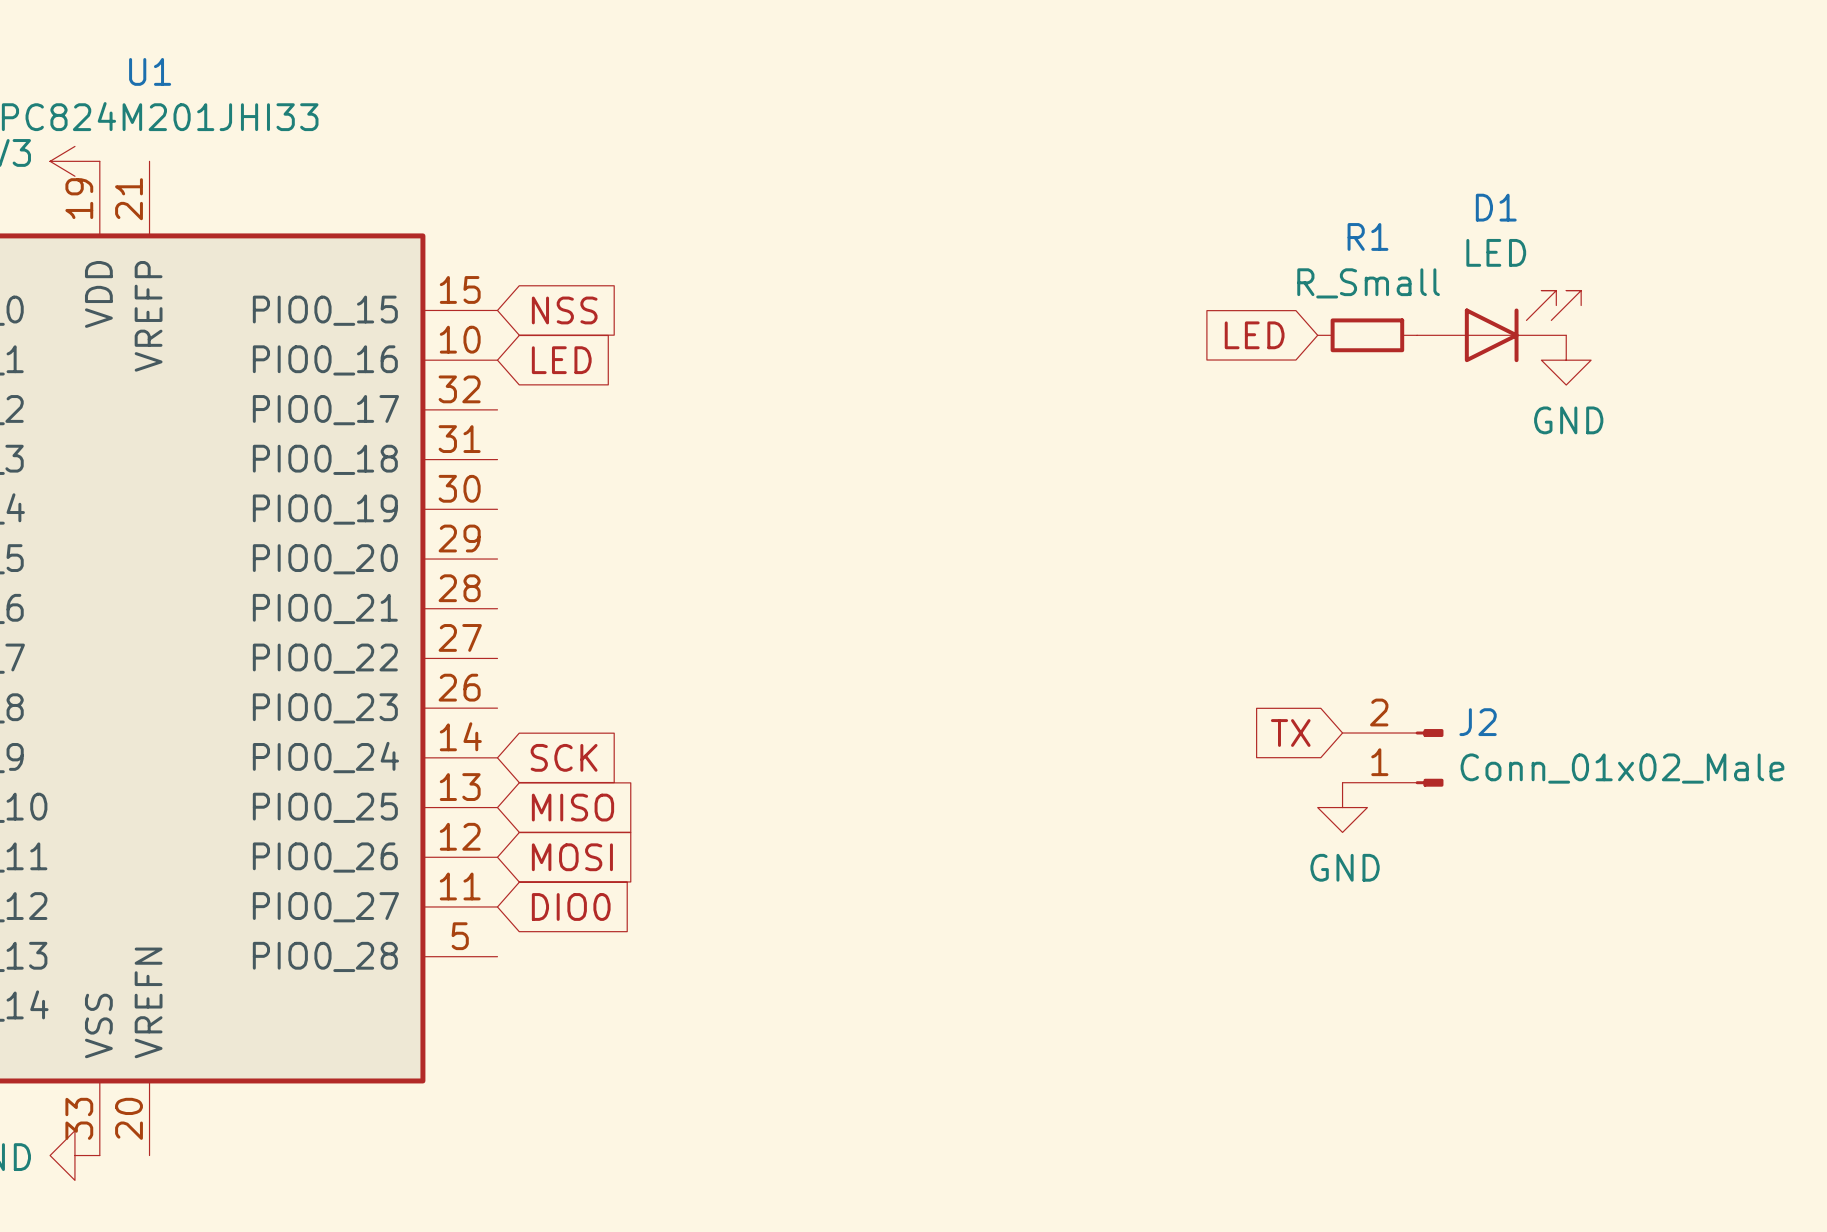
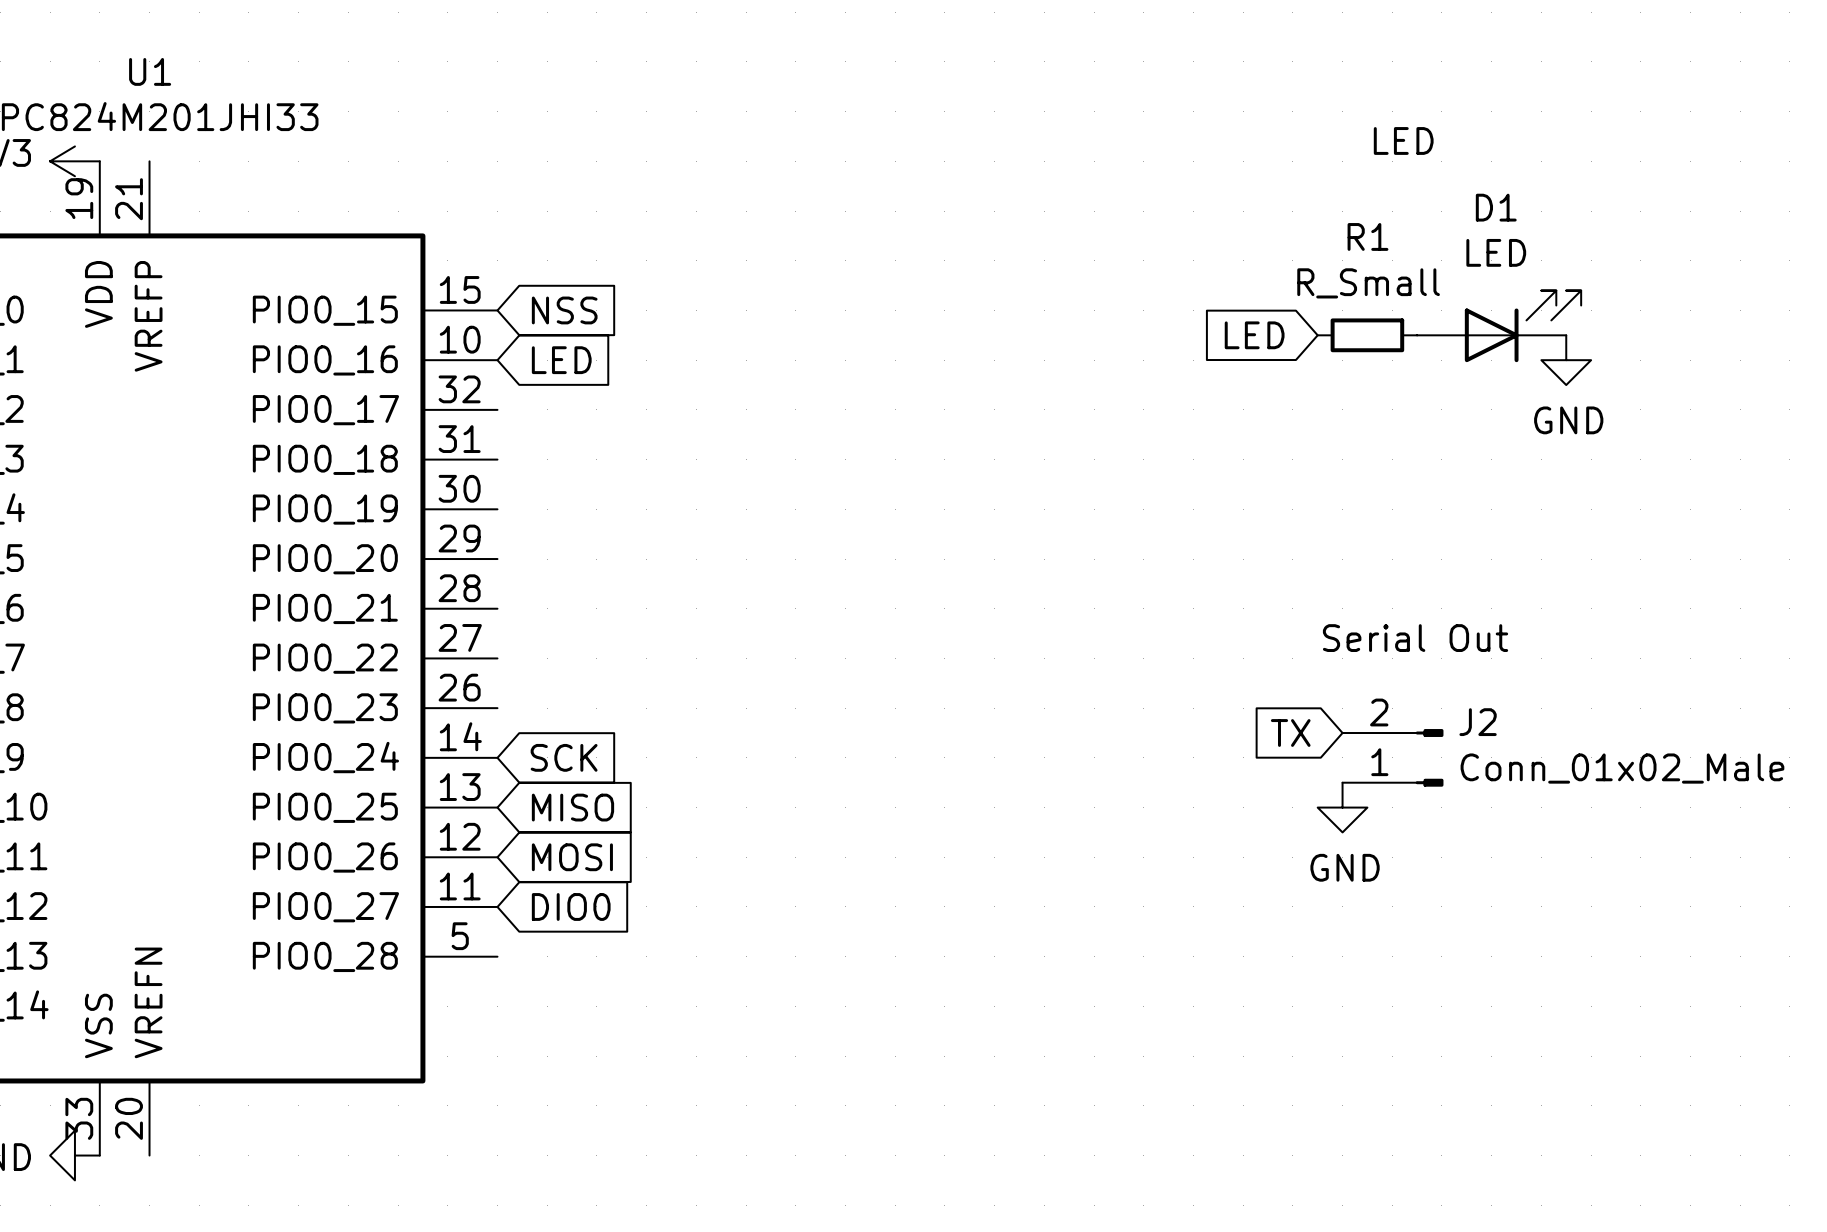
text: none -> LED (1403, 140)
text: none -> Serial Out (1415, 638)

